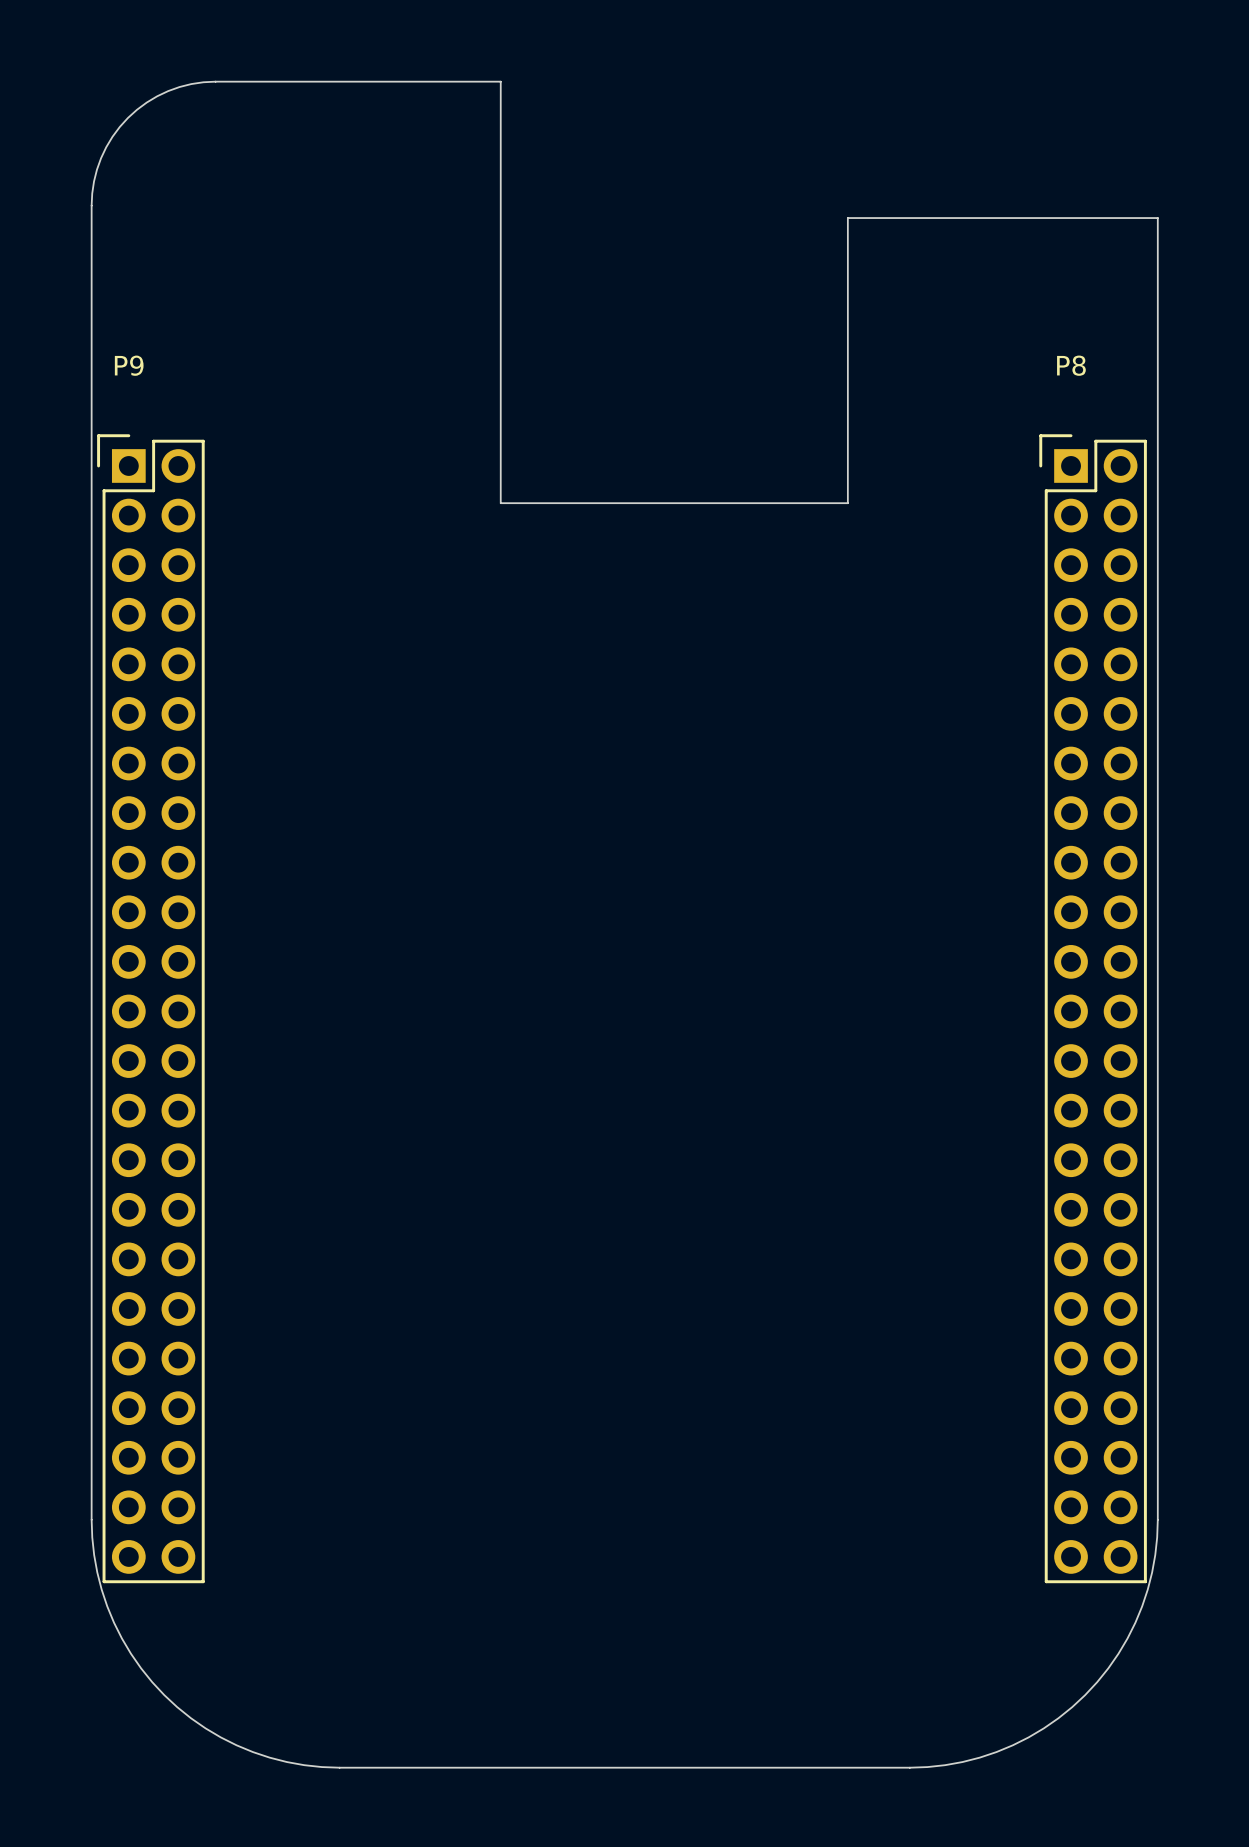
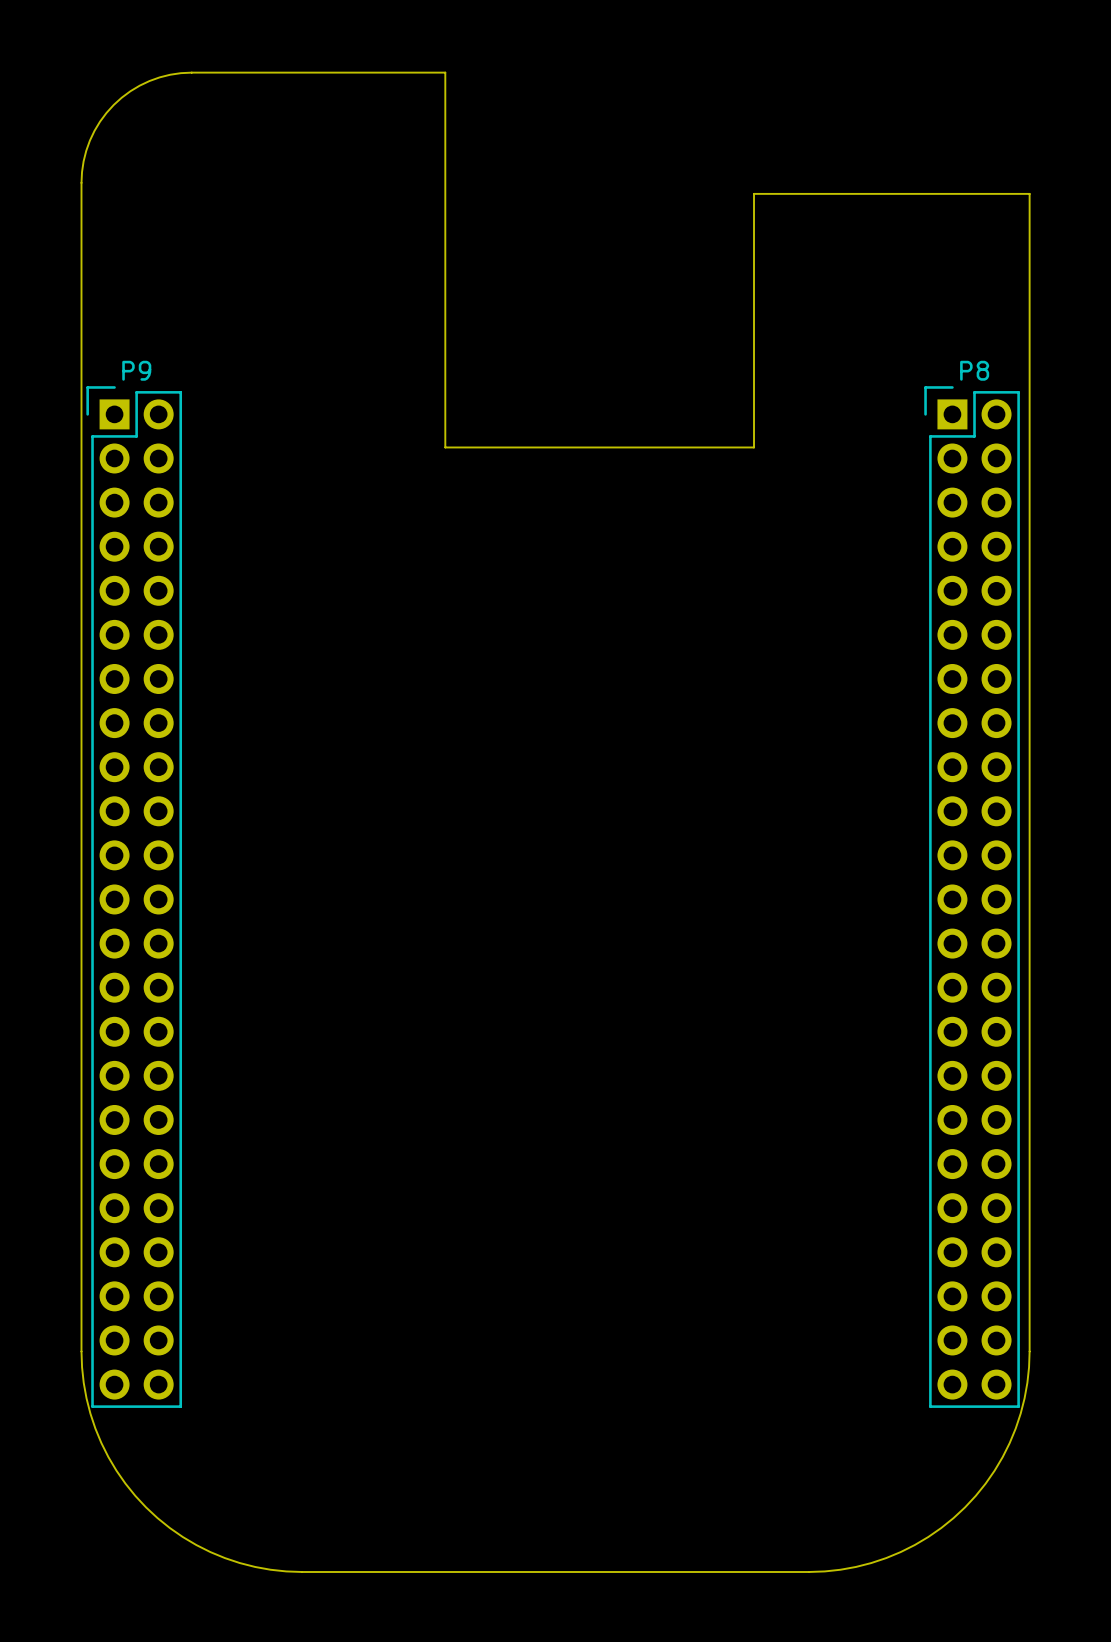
P9 name position: P9 (129, 365) -> P9 (136, 370)
P8 name position: P8 (1071, 365) -> P8 (974, 370)

